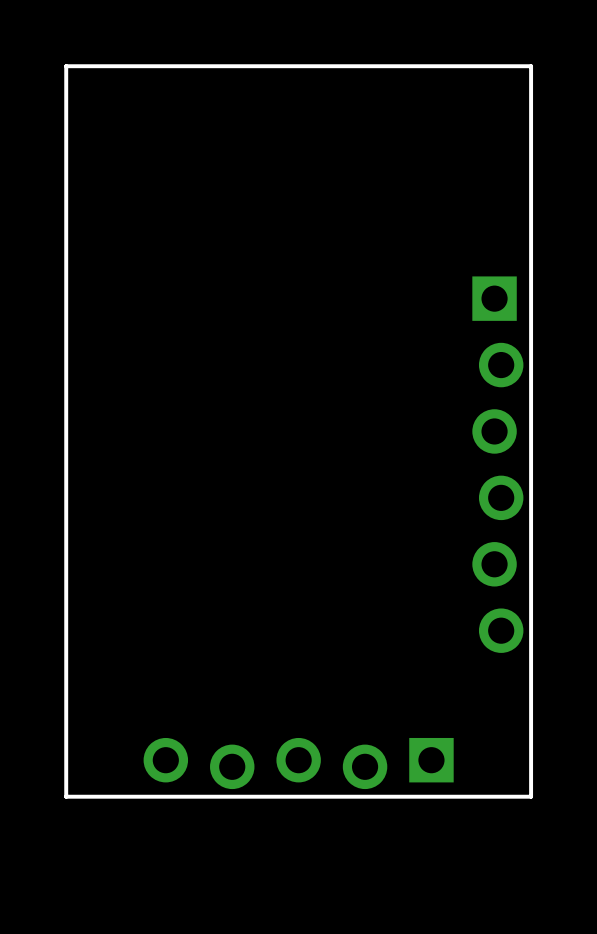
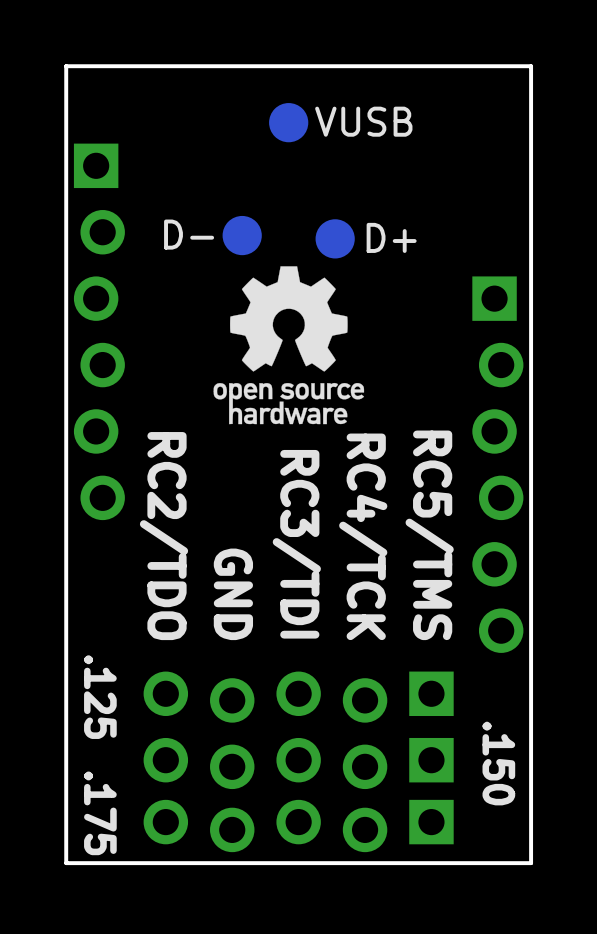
VUSB: none -> (288, 122)
D-: none -> (242, 235)
D+: none -> (335, 238)
drawing: none -> [213, 266, 365, 425]
part: none -> (99, 331)
text: none -> RC2/TDO (164, 536)
text: none -> RC3/TDI (296, 544)
text: none -> RC5/TMS (429, 535)
text: none -> RC4/TCK (363, 536)
text: none -> GND (233, 594)
part: none -> (298, 697)
text: none -> .125 (100, 697)
text: none -> .150 (498, 763)
board edge: (531, 796) (66, 796) -> (531, 796) (531, 863) (66, 863) (66, 796)
text: none -> .175 (100, 813)
part: none -> (298, 826)

